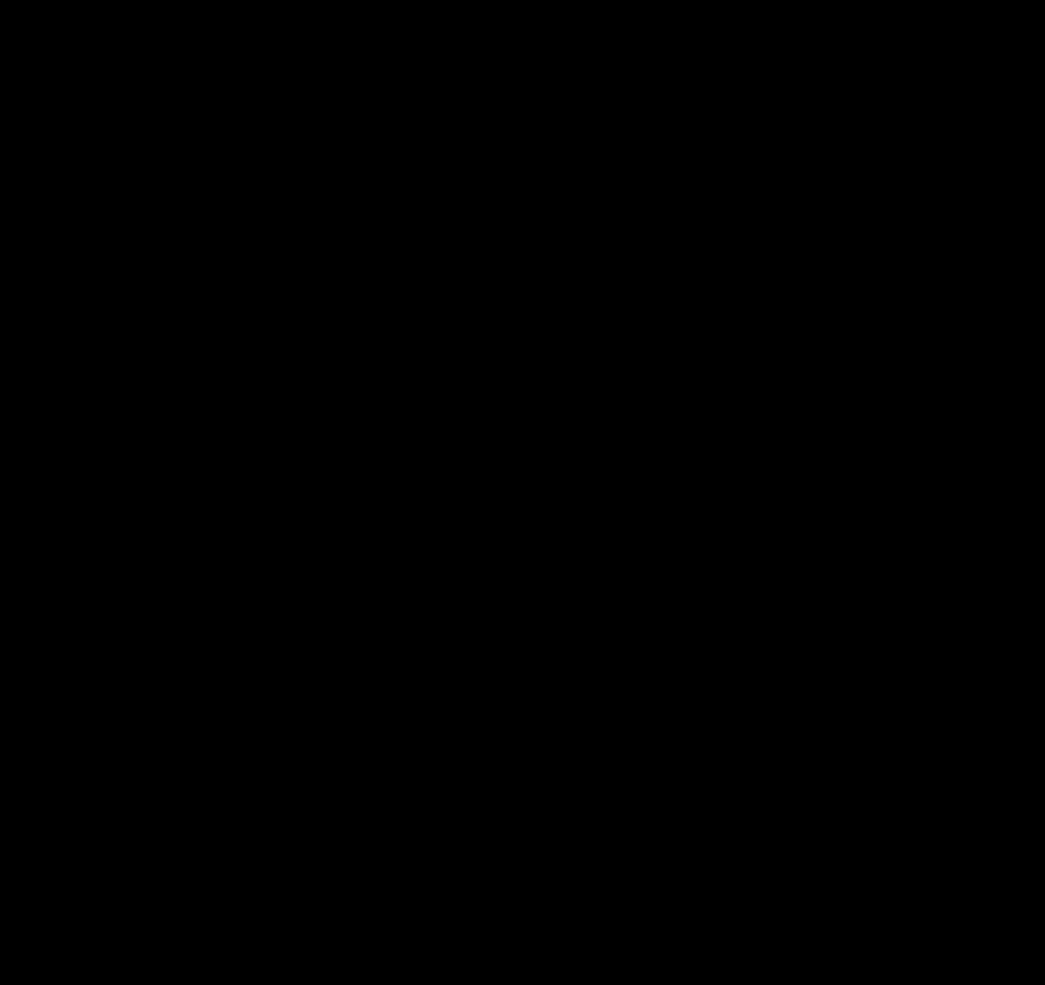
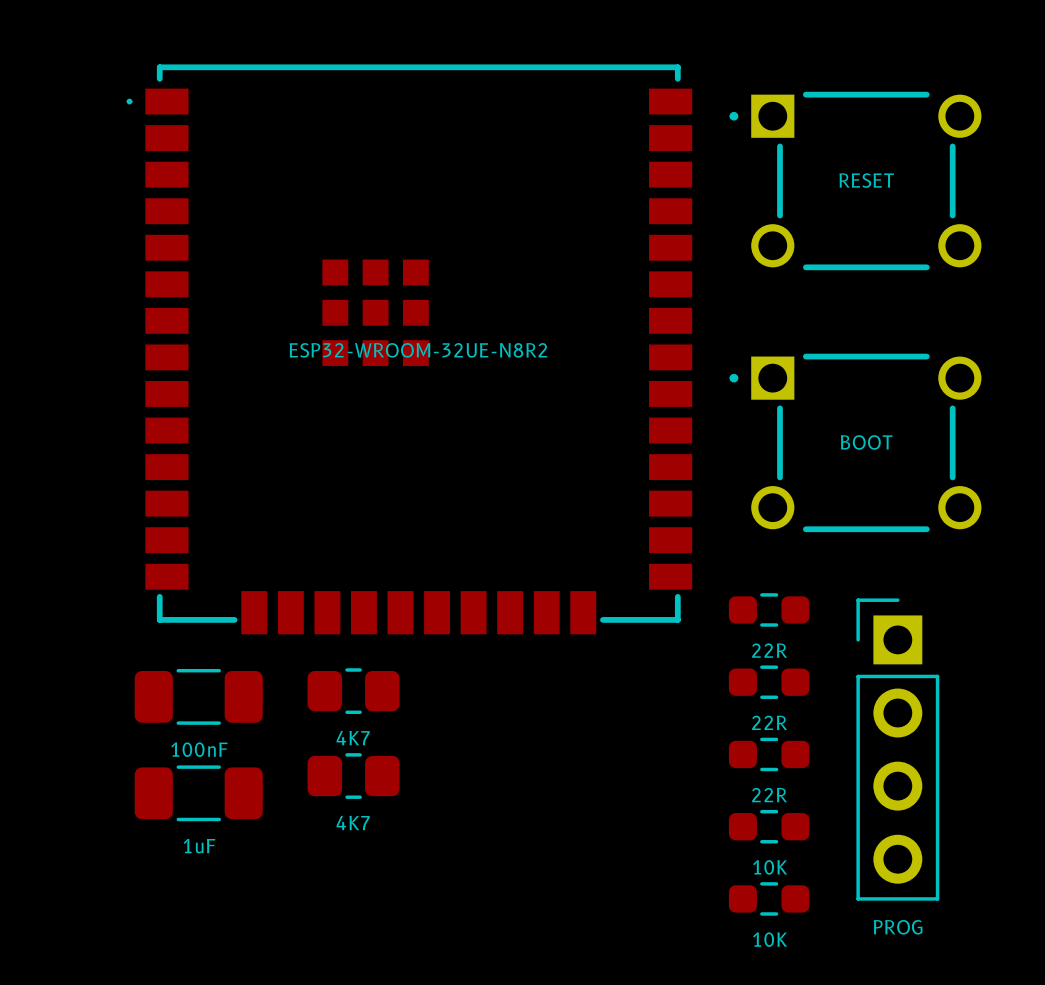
part: none -> RESET (855, 180)
part: none -> ESP32-WROOM-32UE-N8R2 (409, 349)
part: none -> BOOT (855, 442)
part: none -> 22R (769, 609)
part: none -> 22R (769, 682)
part: none -> 4K7 (353, 691)
part: none -> 100nF (198, 696)
part: none -> PROG (897, 749)
part: none -> 22R (769, 754)
part: none -> 4K7 (353, 776)
part: none -> 1uF (198, 793)
part: none -> 10K (769, 826)
part: none -> 10K (769, 898)

